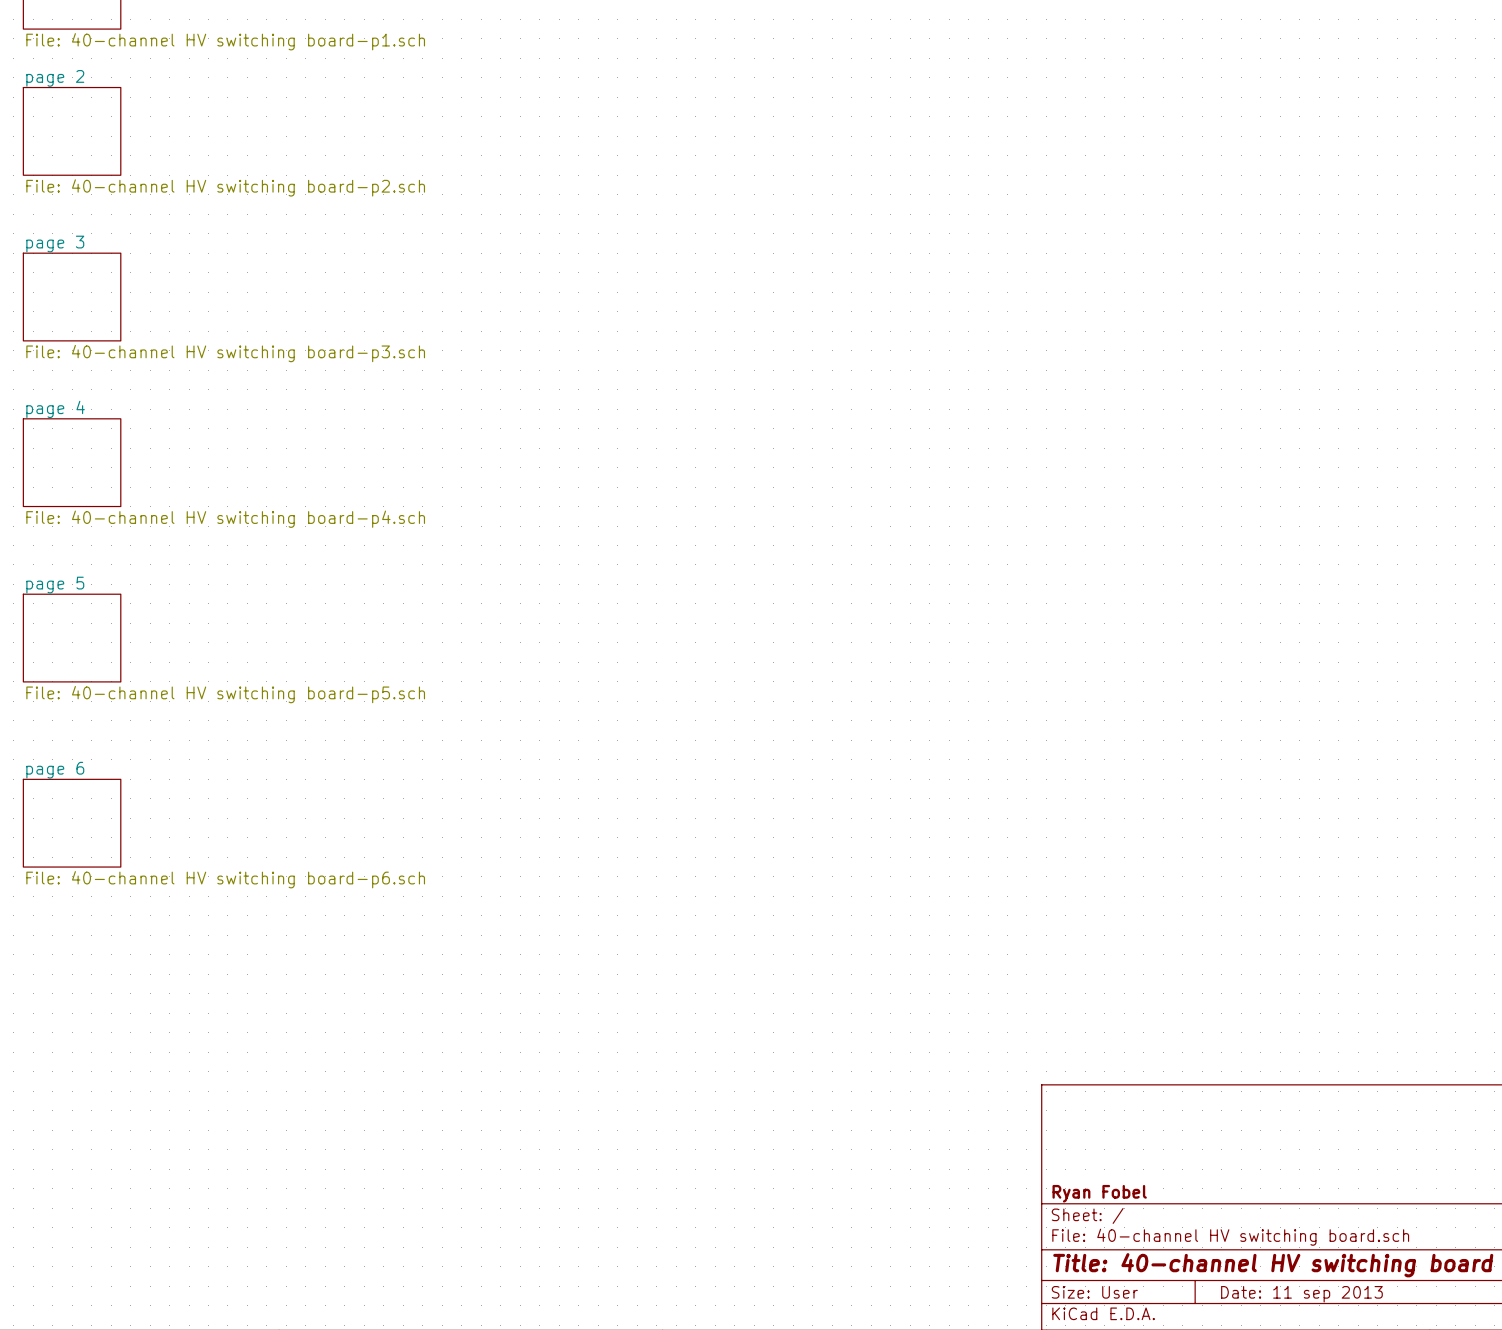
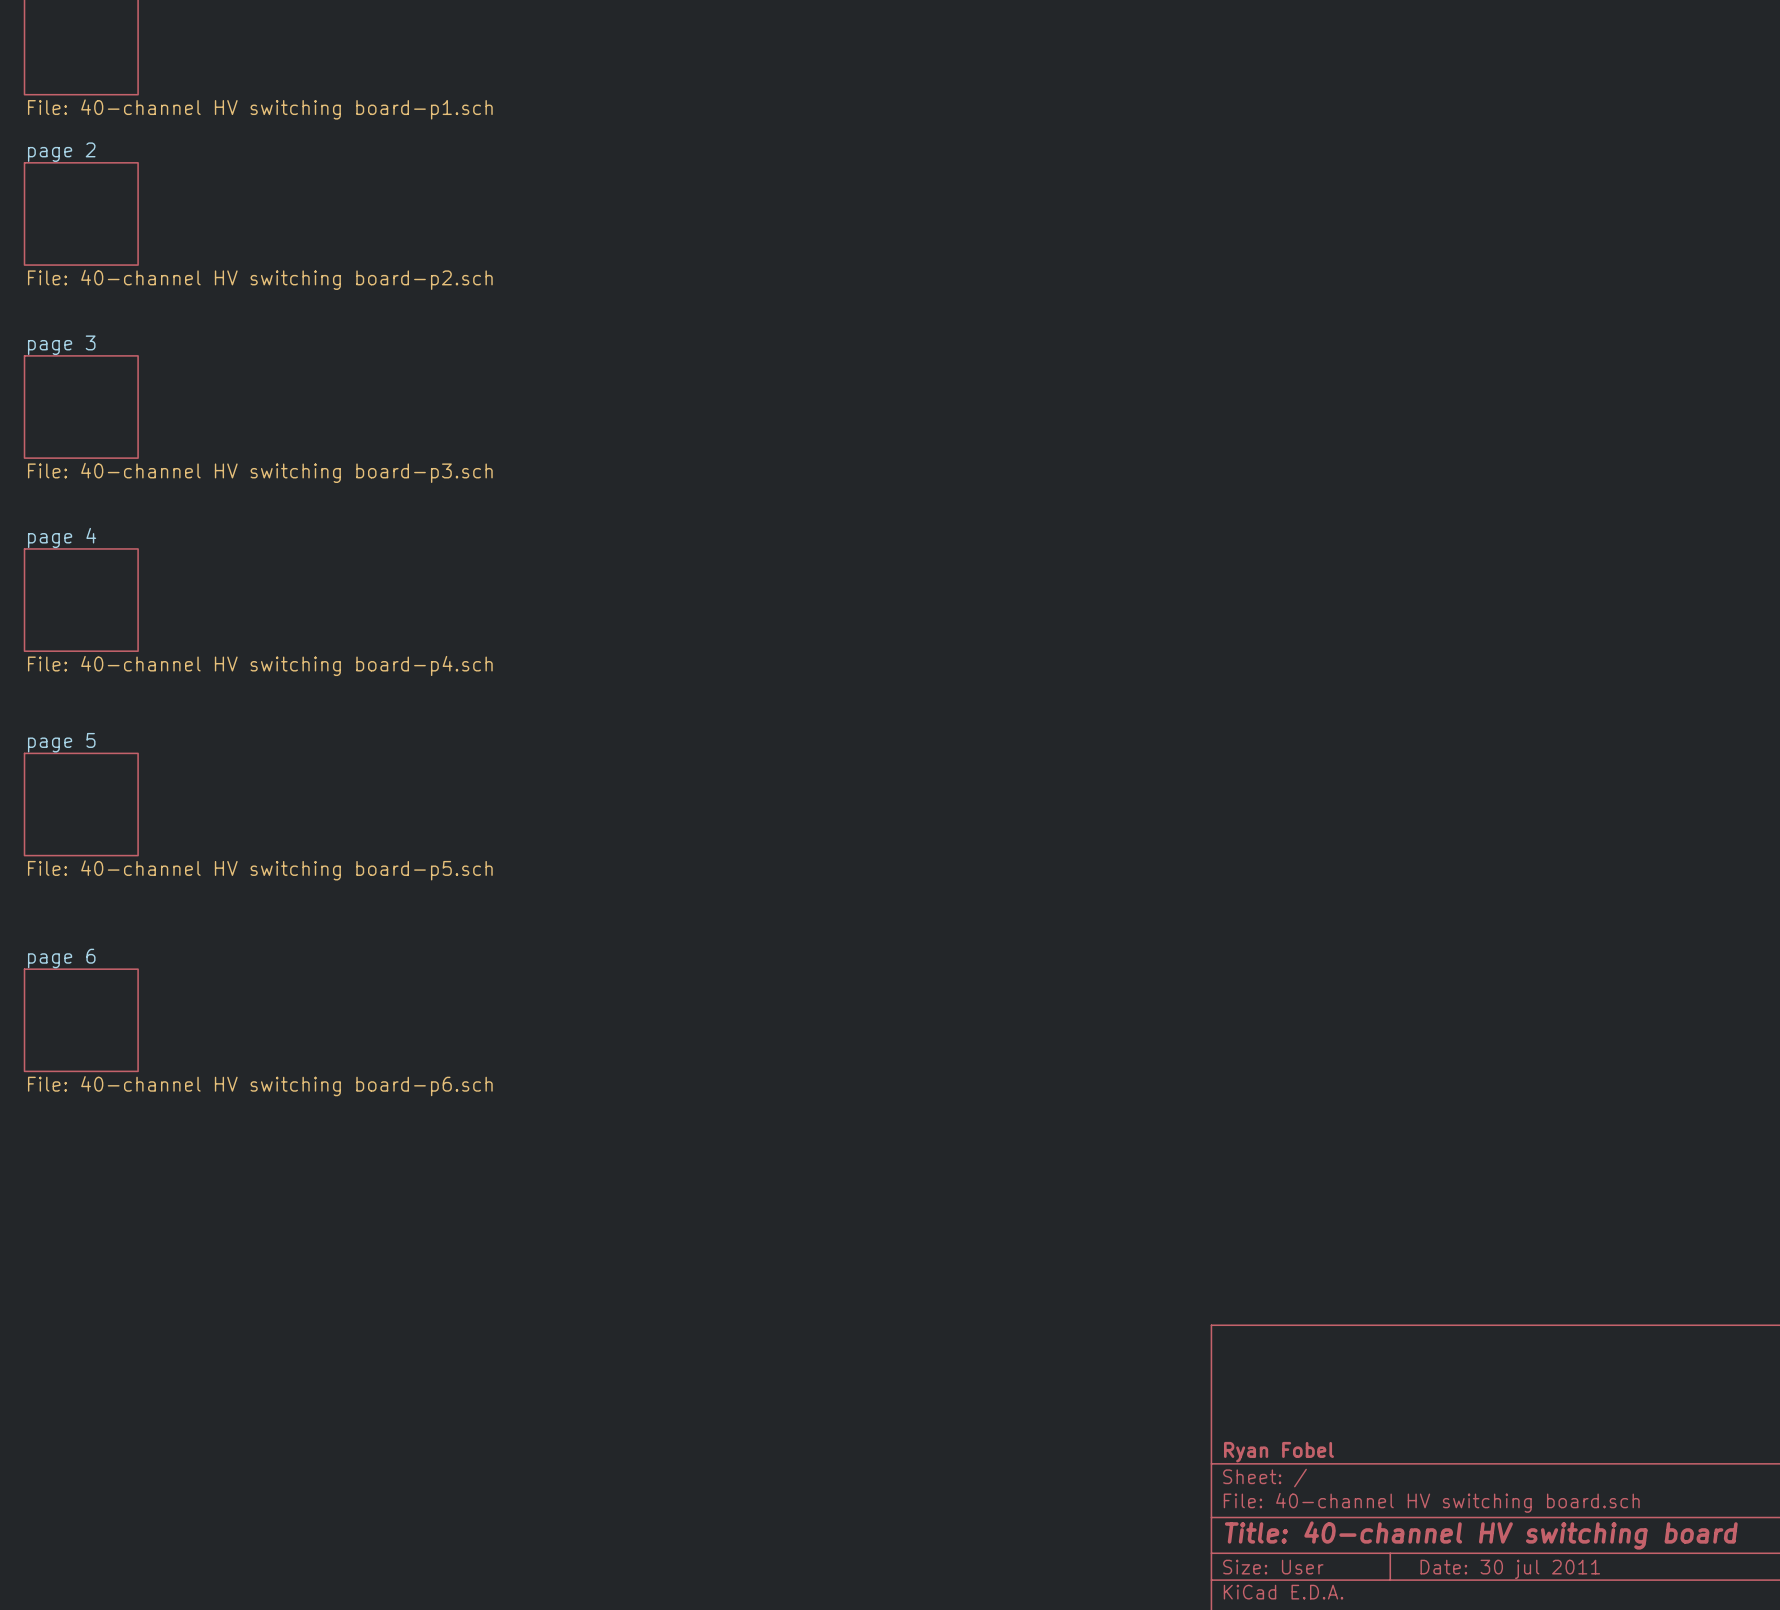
title block: Date: 11 sep 2013 (1301, 1294) -> Date: 30 jul 2011 (1510, 1569)

